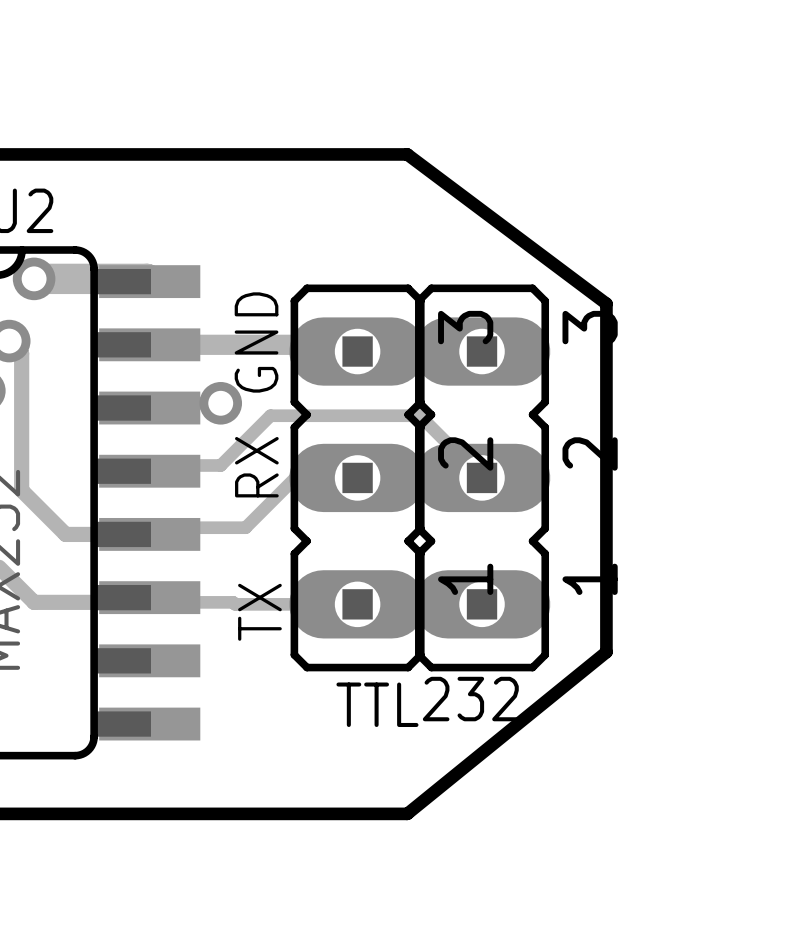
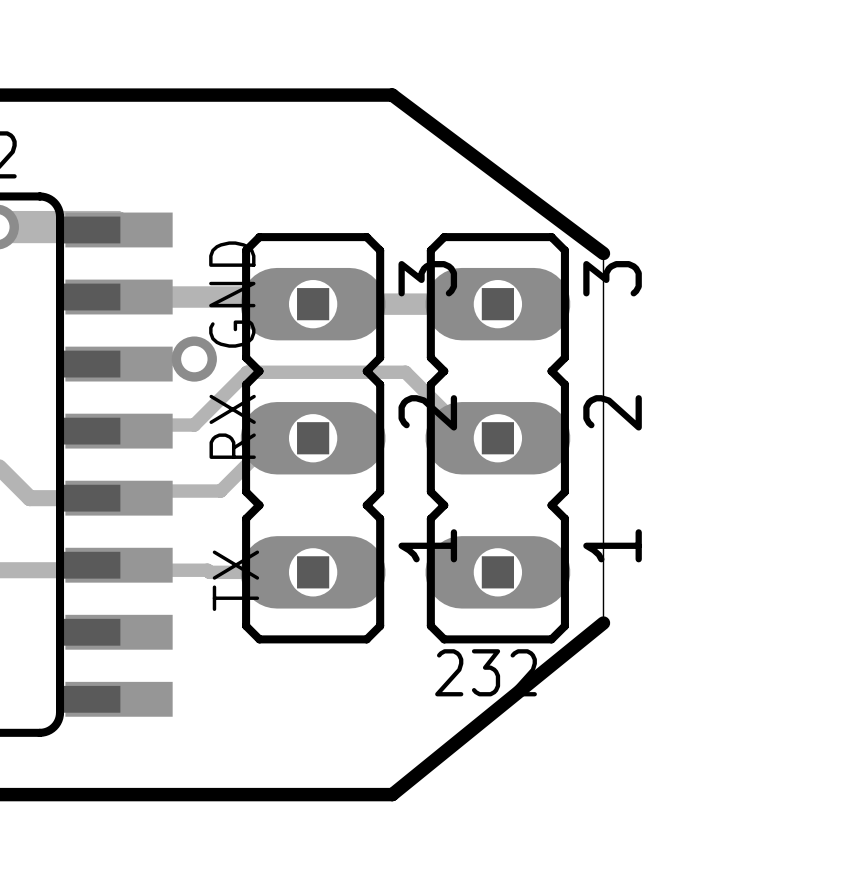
board edge width: thick (606, 303) (606, 652) -> thin (603, 253) (603, 623)
TTL position: (357, 477) -> (313, 438)
232 position: (482, 477) -> (497, 438)
TTL name: TTL (377, 704) -> none

